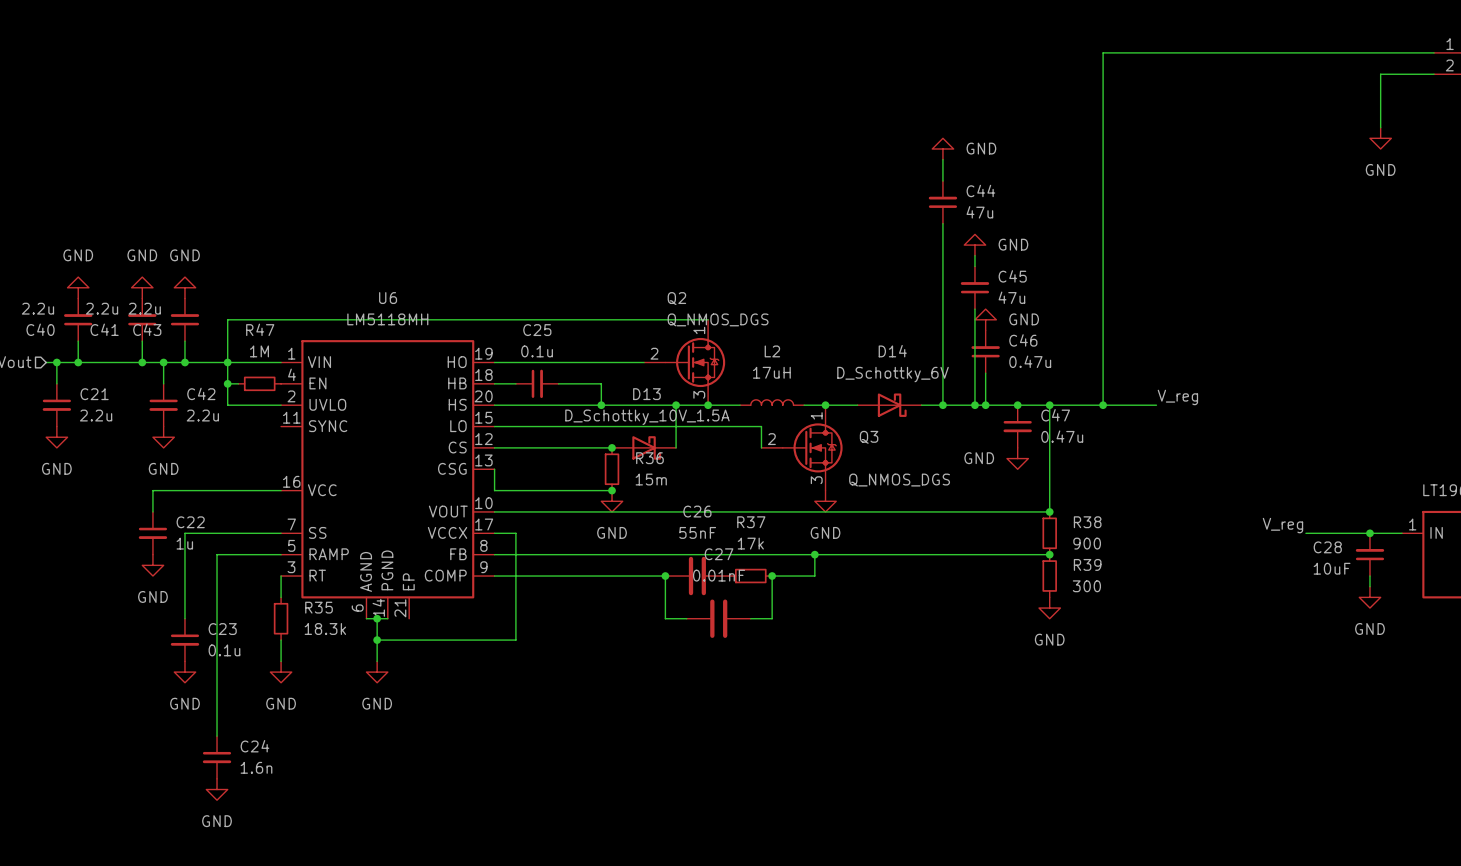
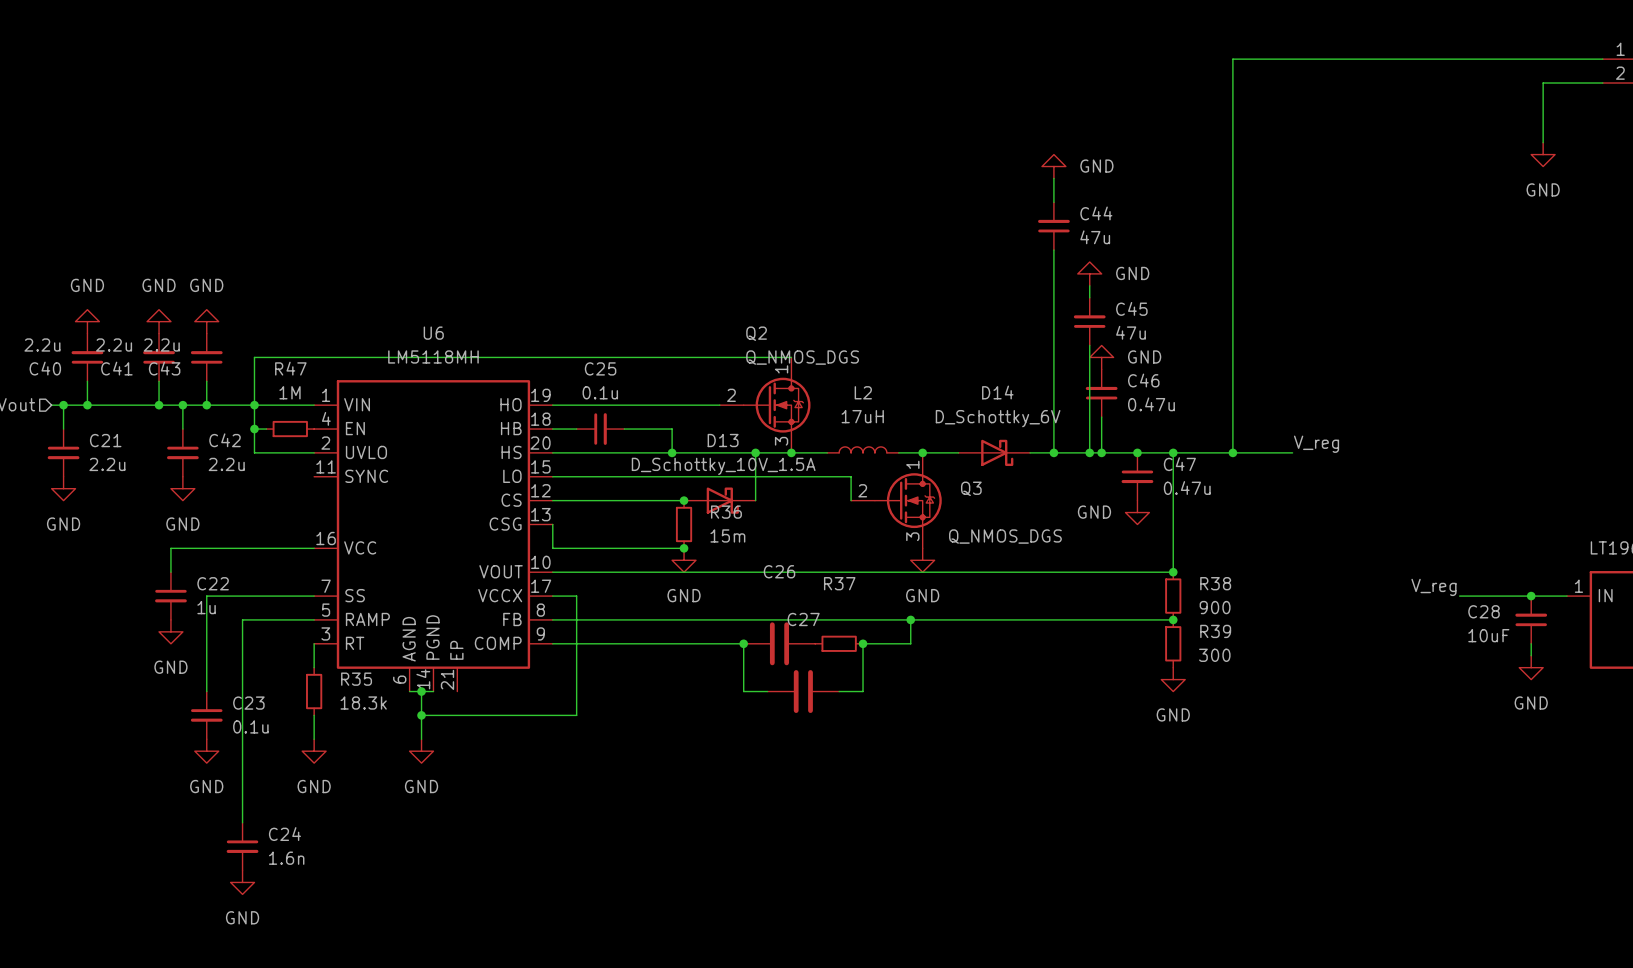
C26 value: 55nF (697, 532) -> none
R37 value: 17k (750, 543) -> none
C27 value: 0.01nF (719, 575) -> none

